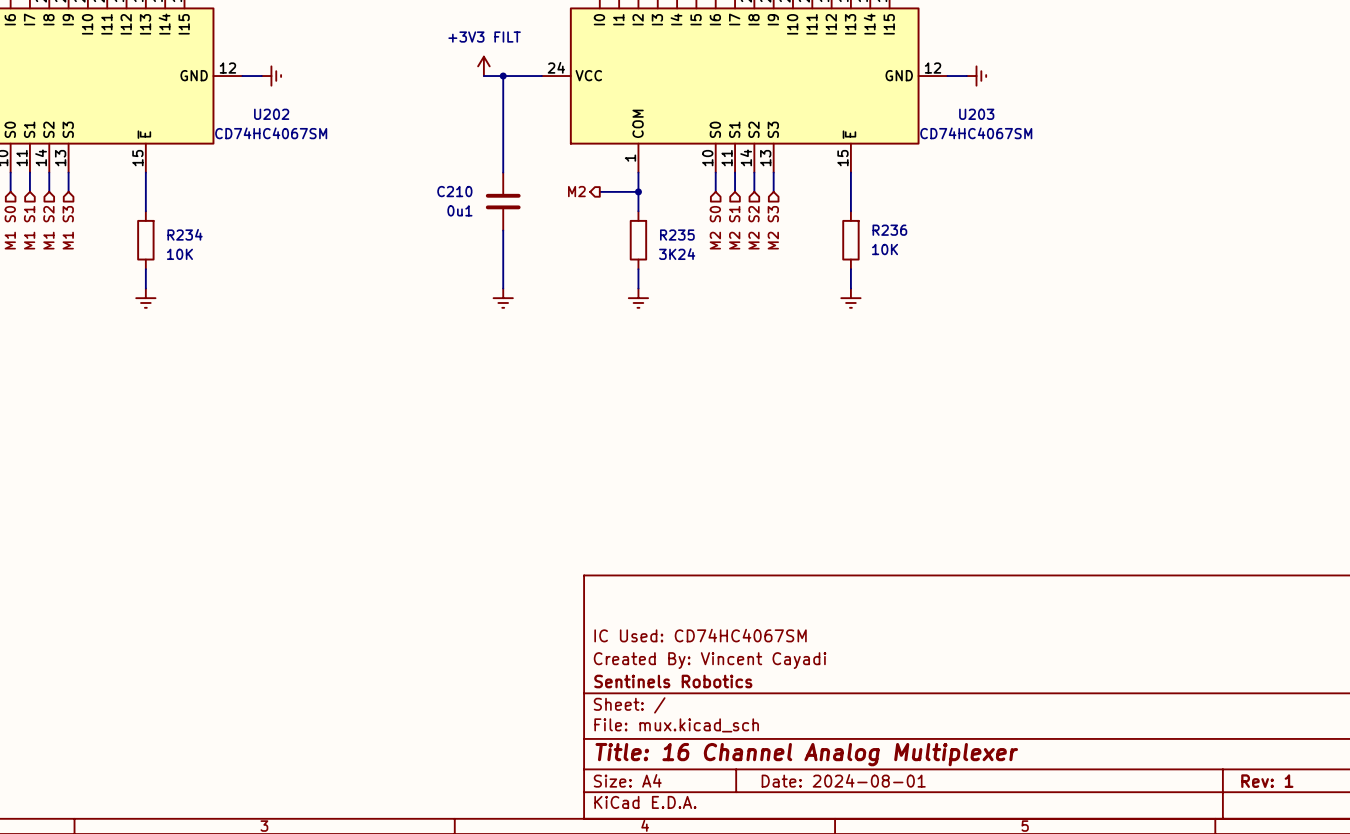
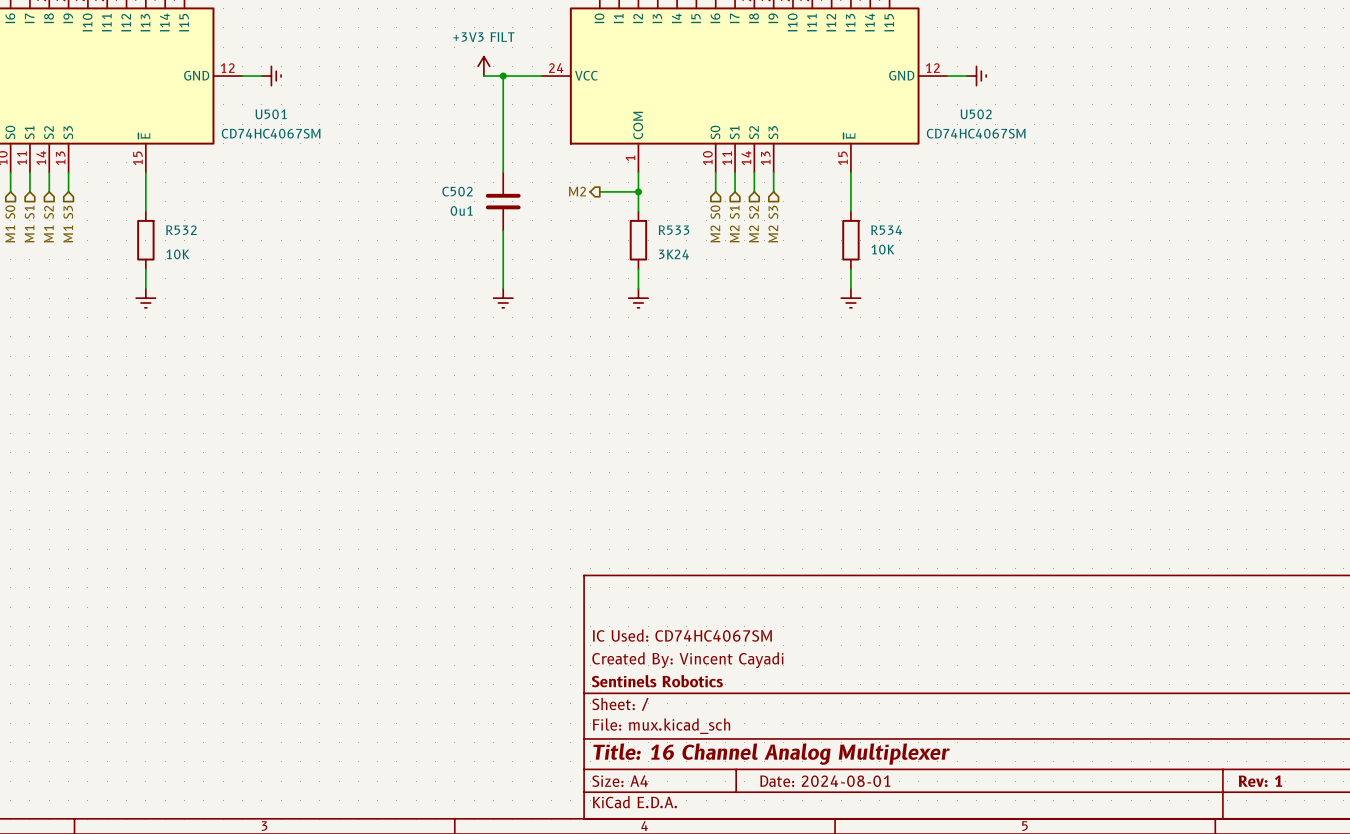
U202 name: U202 (271, 114) -> U501 (271, 114)
U203 name: U203 (976, 114) -> U502 (976, 114)
C210 name: C210 (454, 191) -> C502 (457, 191)
R236 name: R236 (889, 230) -> R534 (886, 230)
R234 name: R234 (185, 234) -> R532 (181, 230)
R235 name: R235 (677, 235) -> R533 (674, 230)

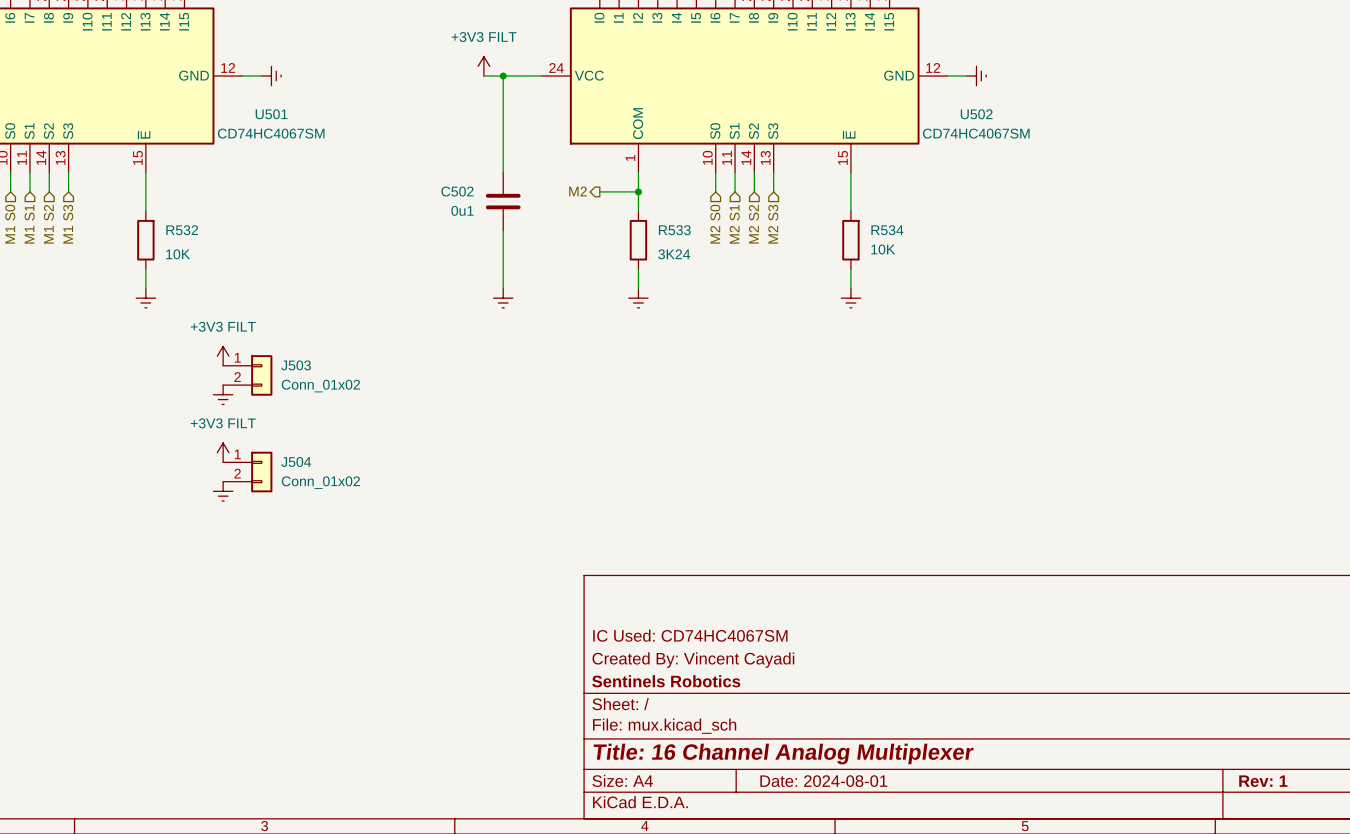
power symbol: none -> +3V3 FILT (223, 356)
J503: none -> Conn_01x02 (247, 375)
power symbol: none -> (223, 394)
power symbol: none -> +3V3 FILT (223, 452)
J504: none -> Conn_01x02 (247, 472)
power symbol: none -> (223, 491)

